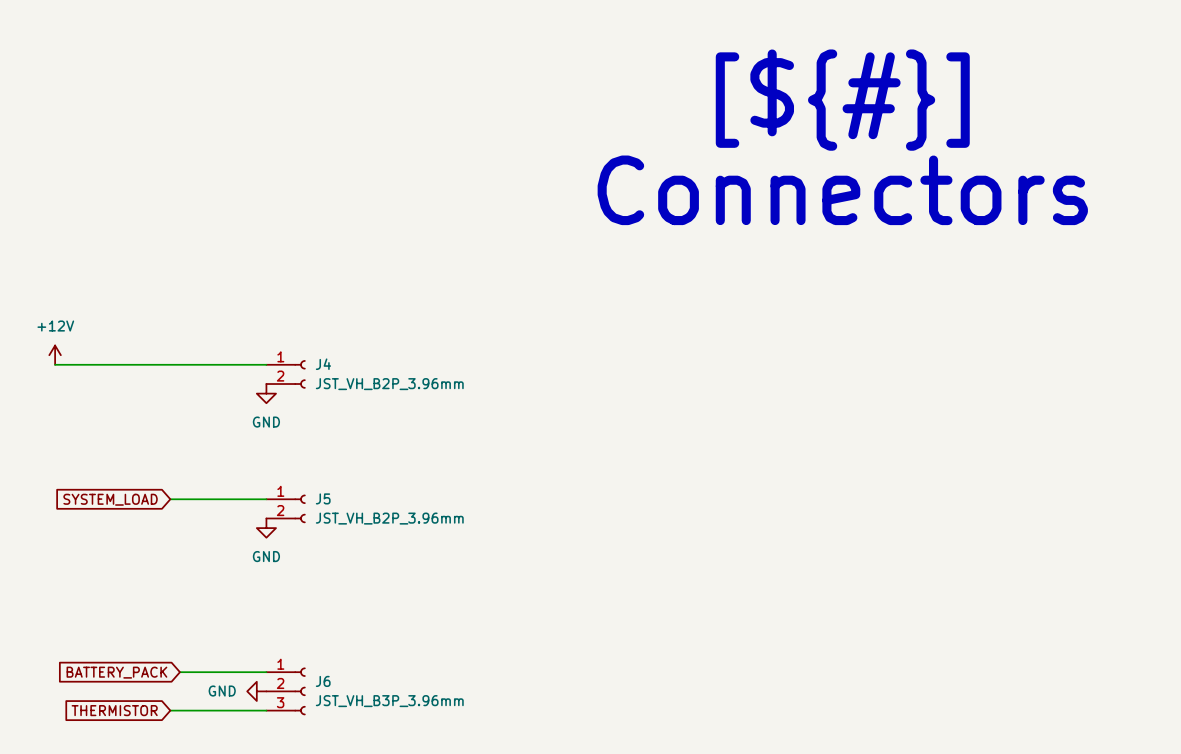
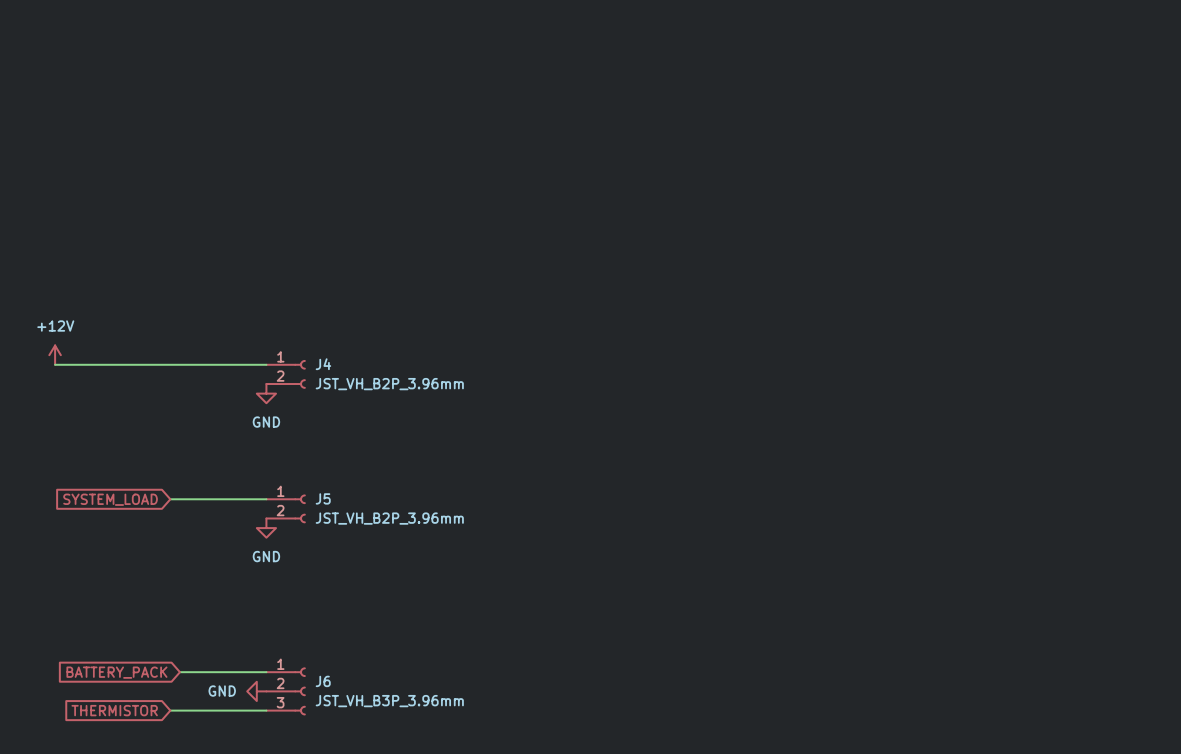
text: [${#}] (842, 100) -> none
text: Connectors (842, 190) -> none

